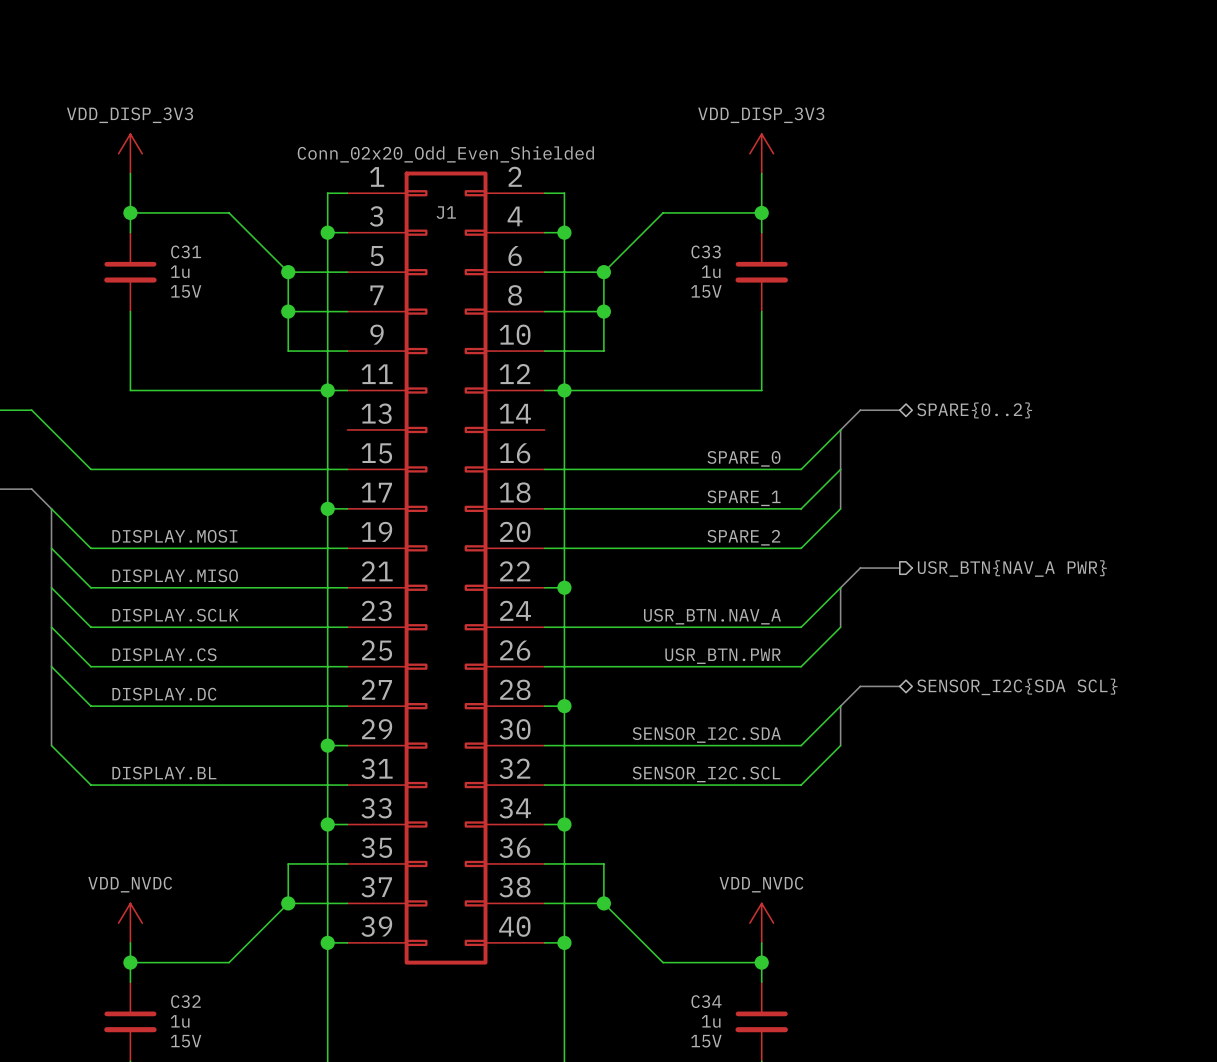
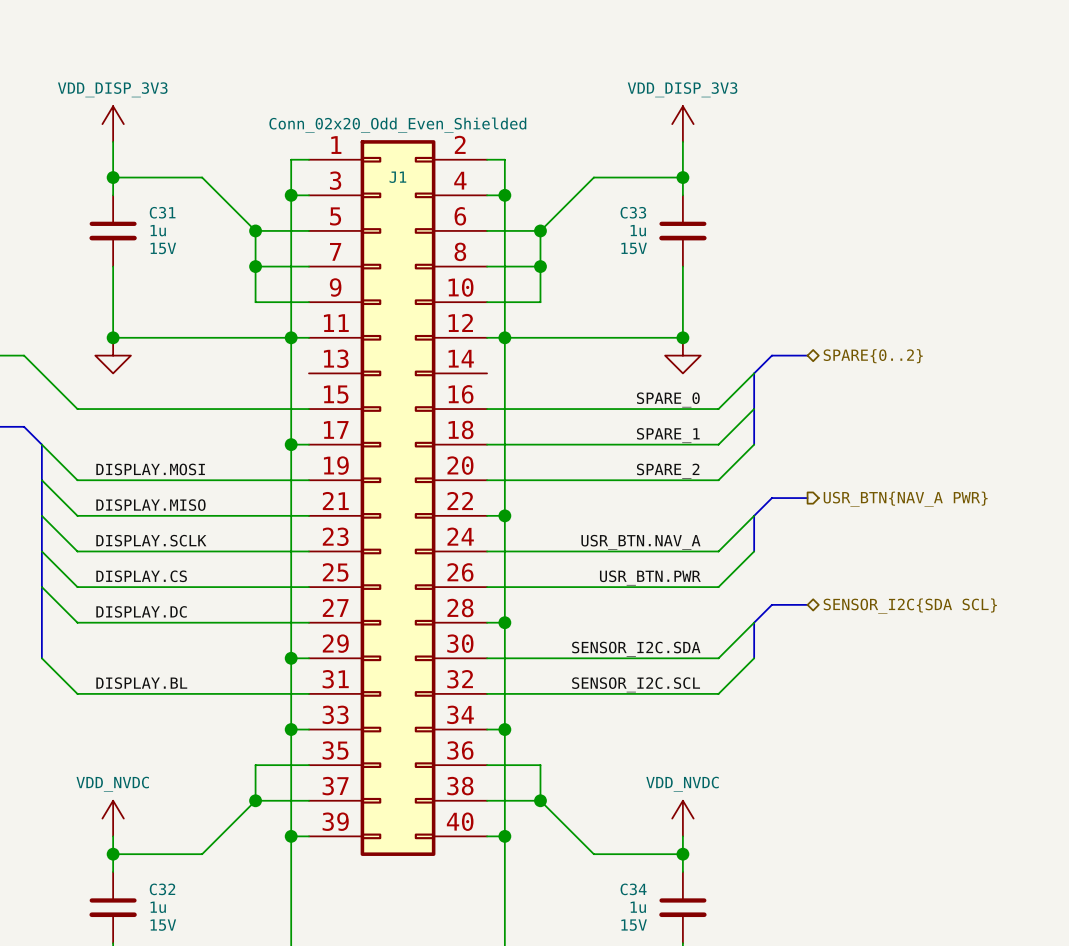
junction: none -> (113, 337)
junction: none -> (682, 337)
power symbol: none -> (113, 355)
power symbol: none -> (682, 355)

